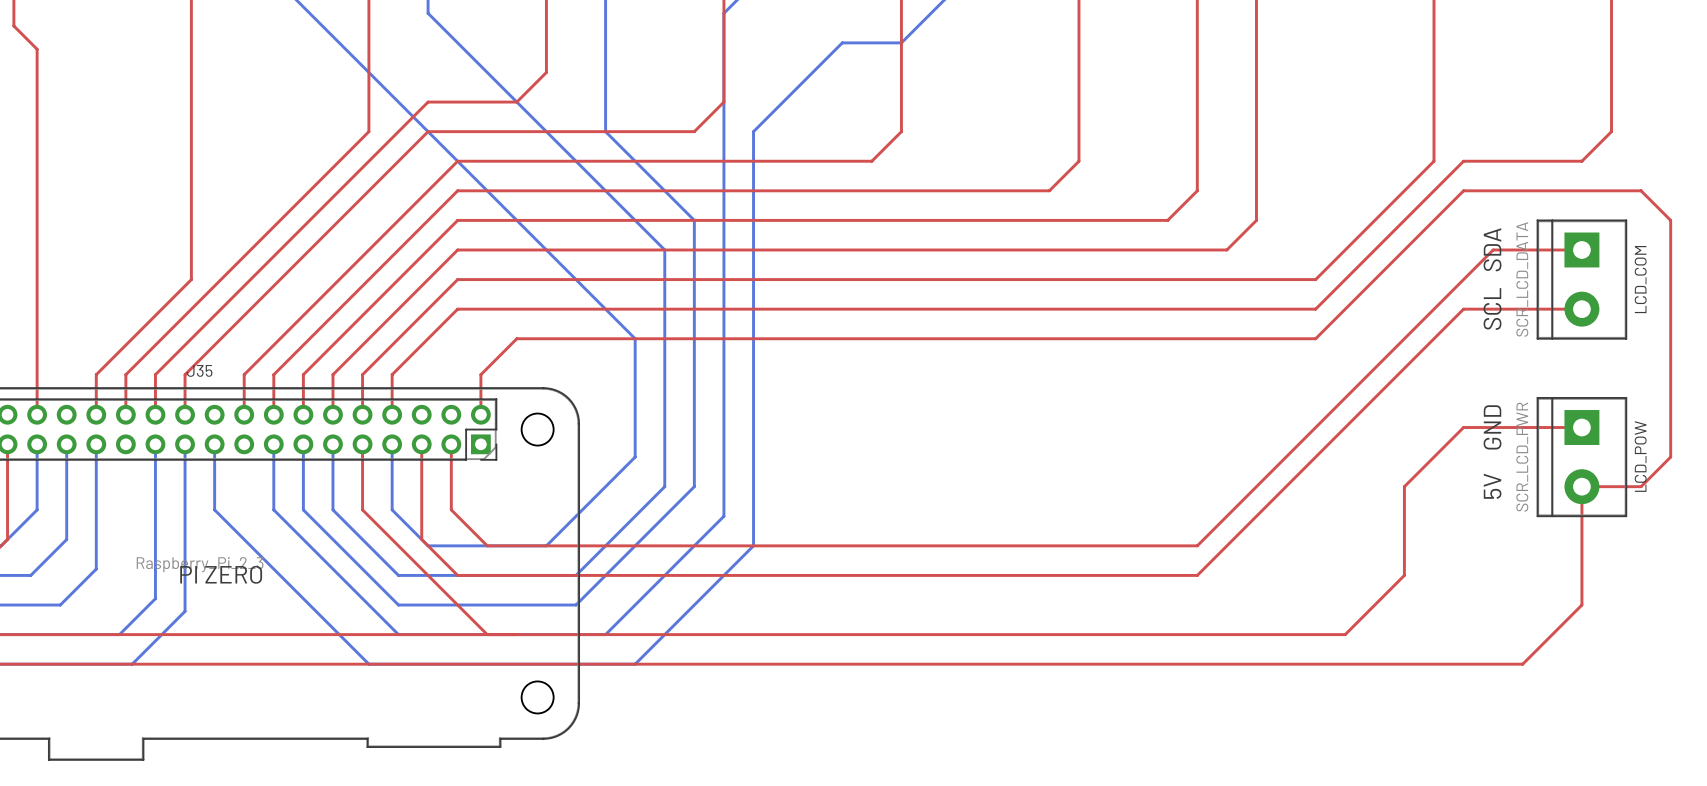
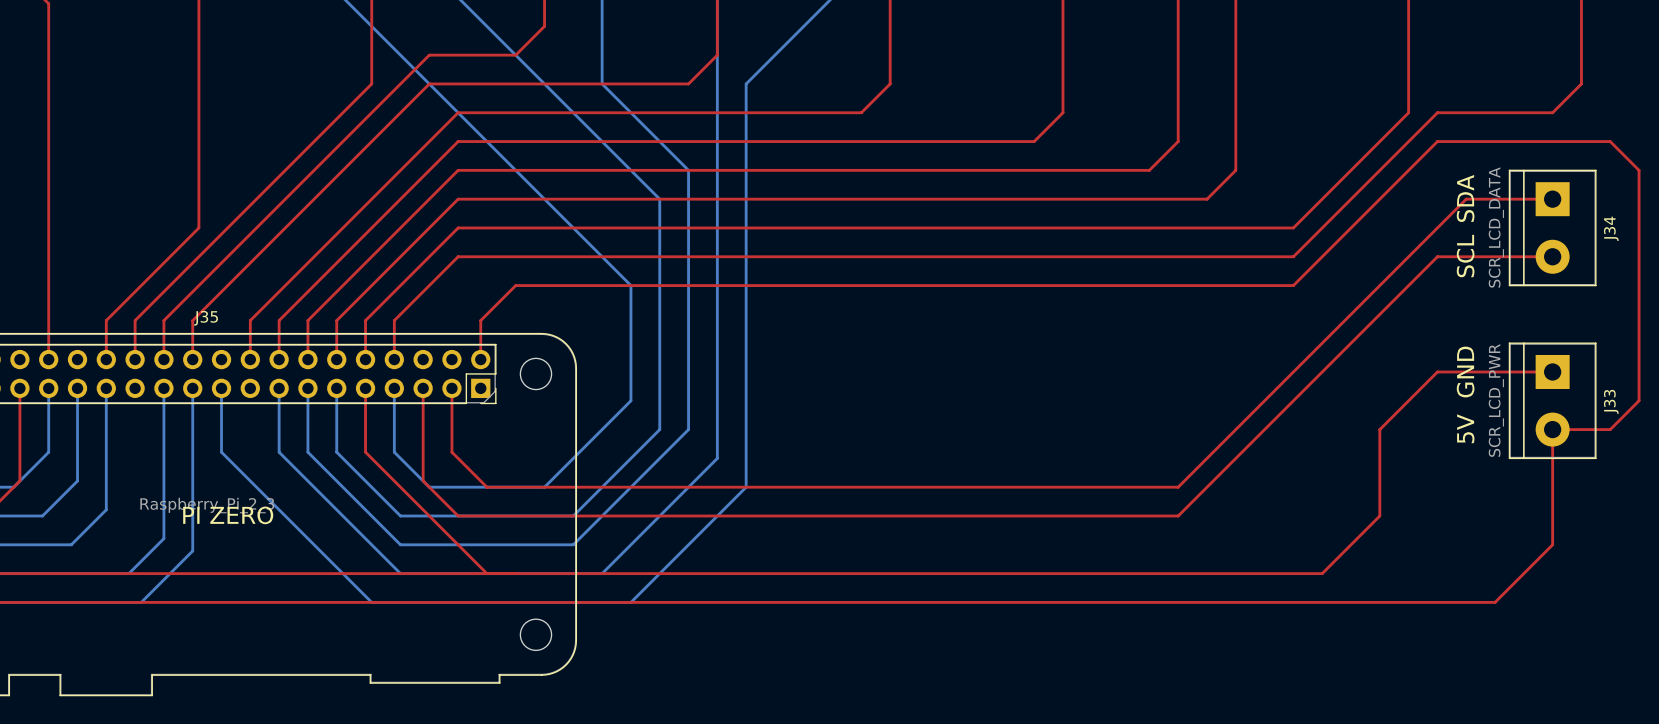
LCD_COM name: LCD_COM (1640, 279) -> J34 (1611, 228)
LCD_POW name: LCD_POW (1640, 456) -> J33 (1611, 401)

